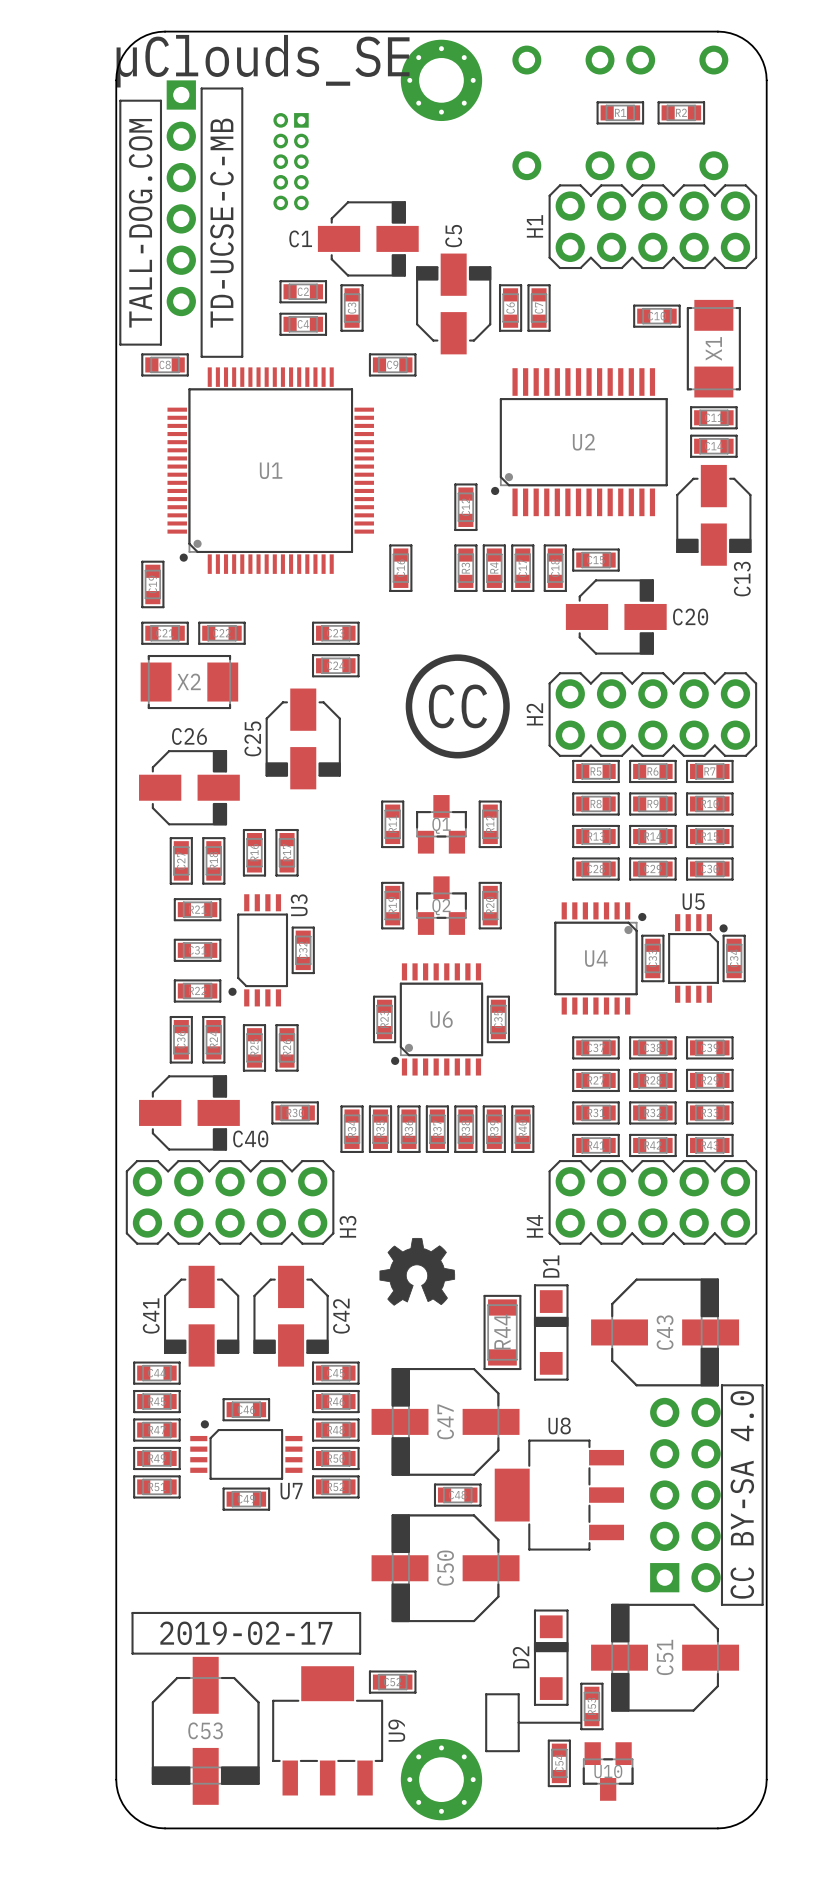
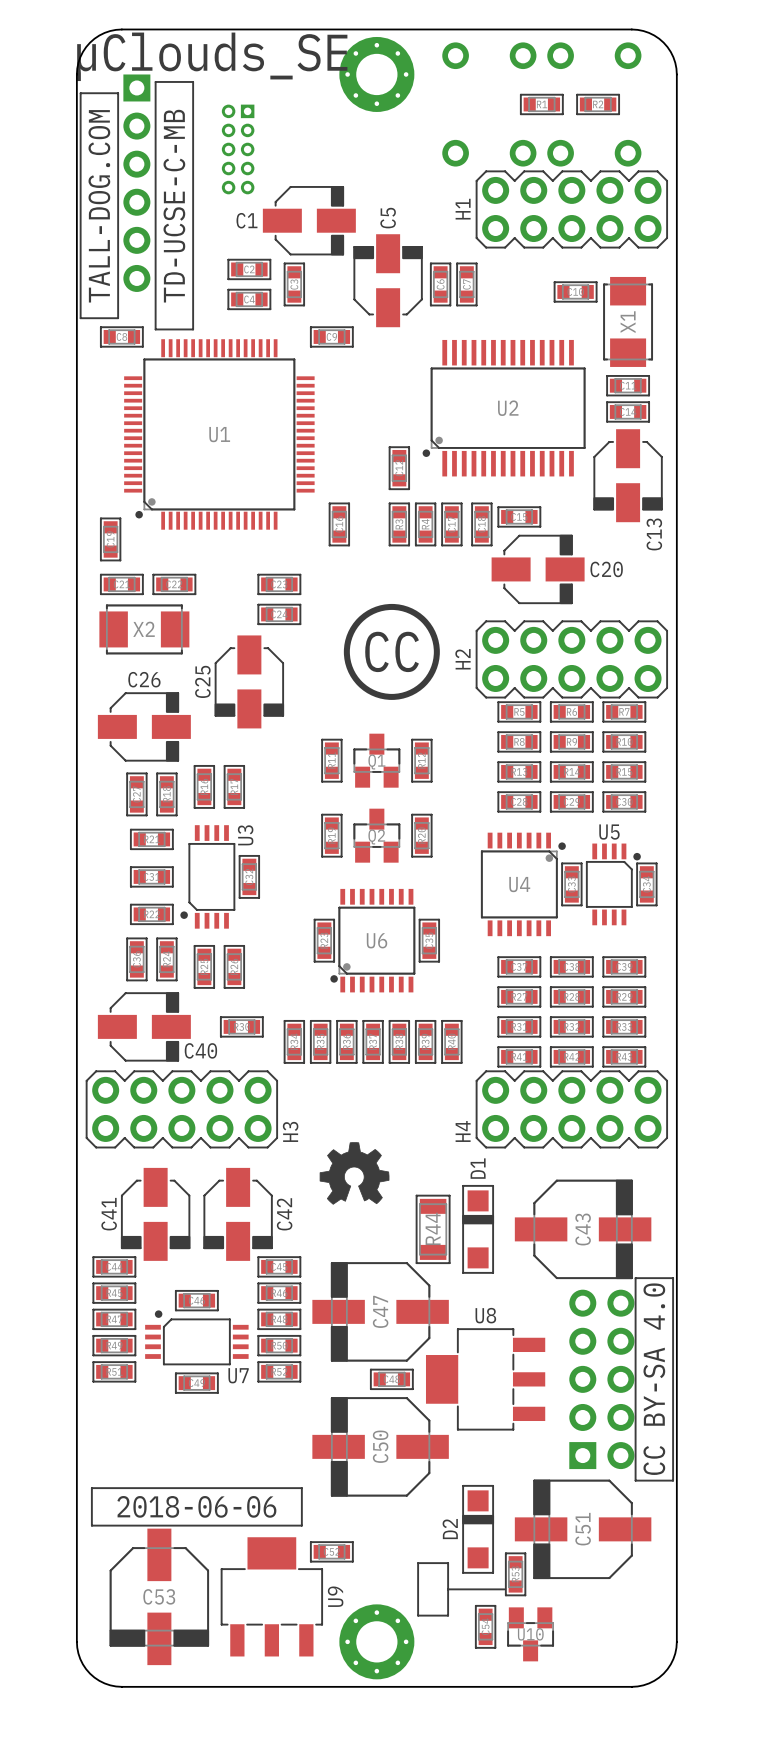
text: 2019-02-17 (246, 1633) -> 2018-06-06 (196, 1506)

